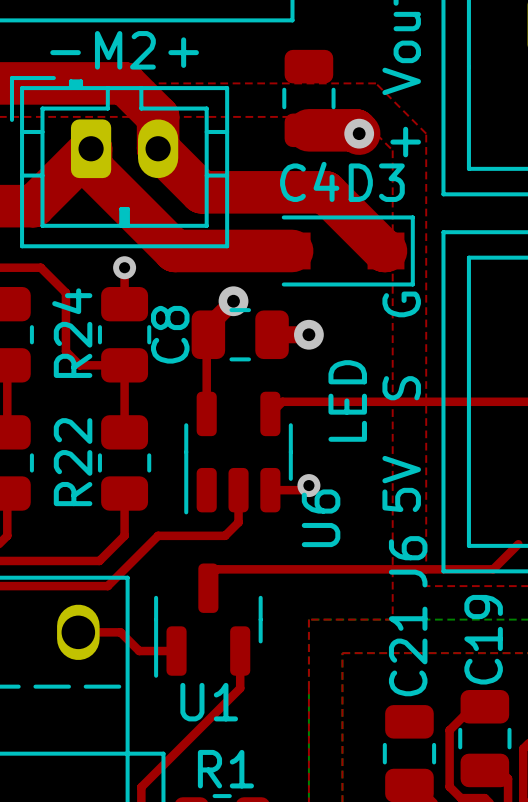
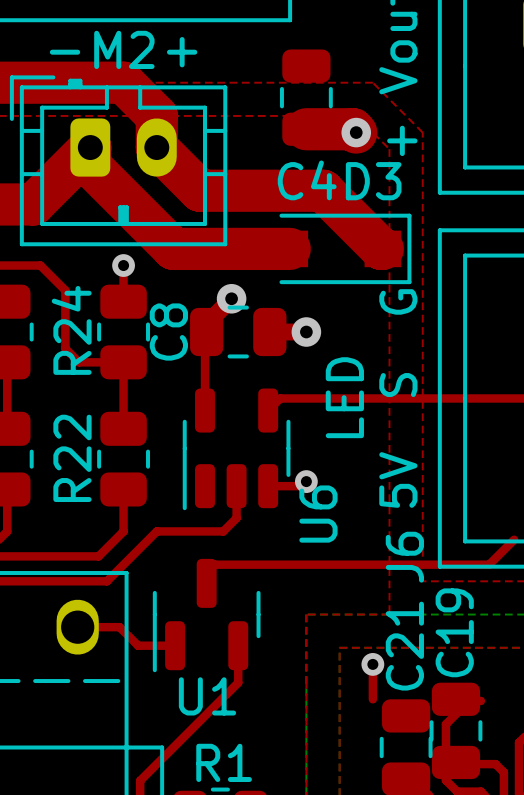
top track: none -> (372, 664) (372, 699)
via: none -> (372, 664)
C19 position: (484, 738) -> (455, 730)

